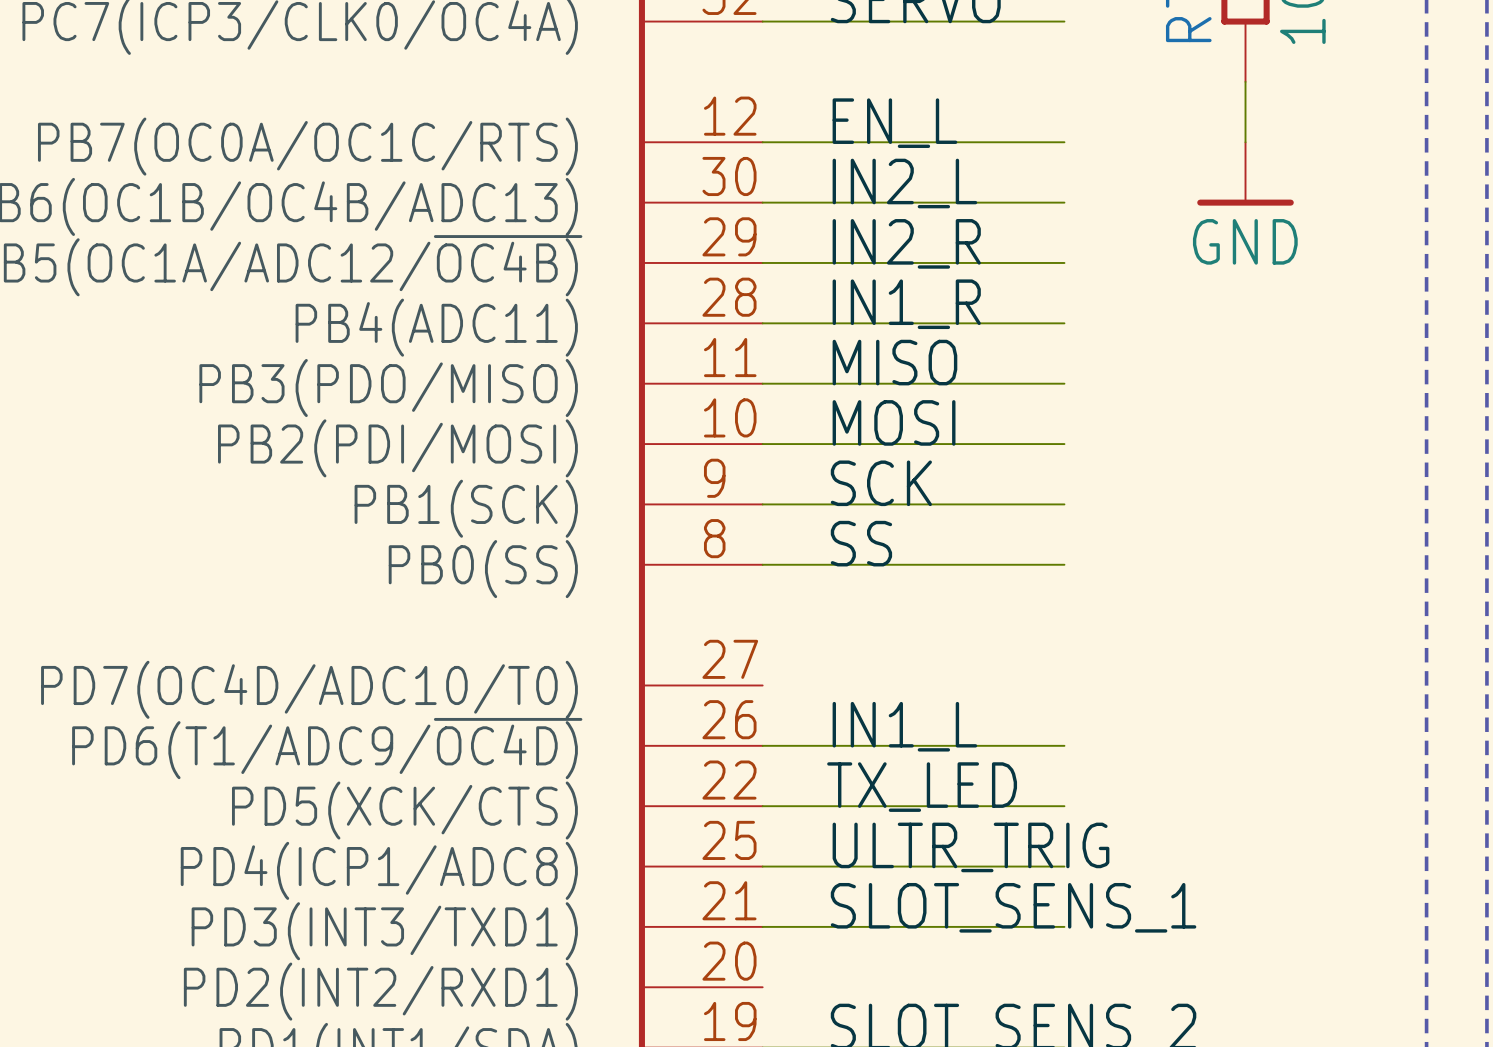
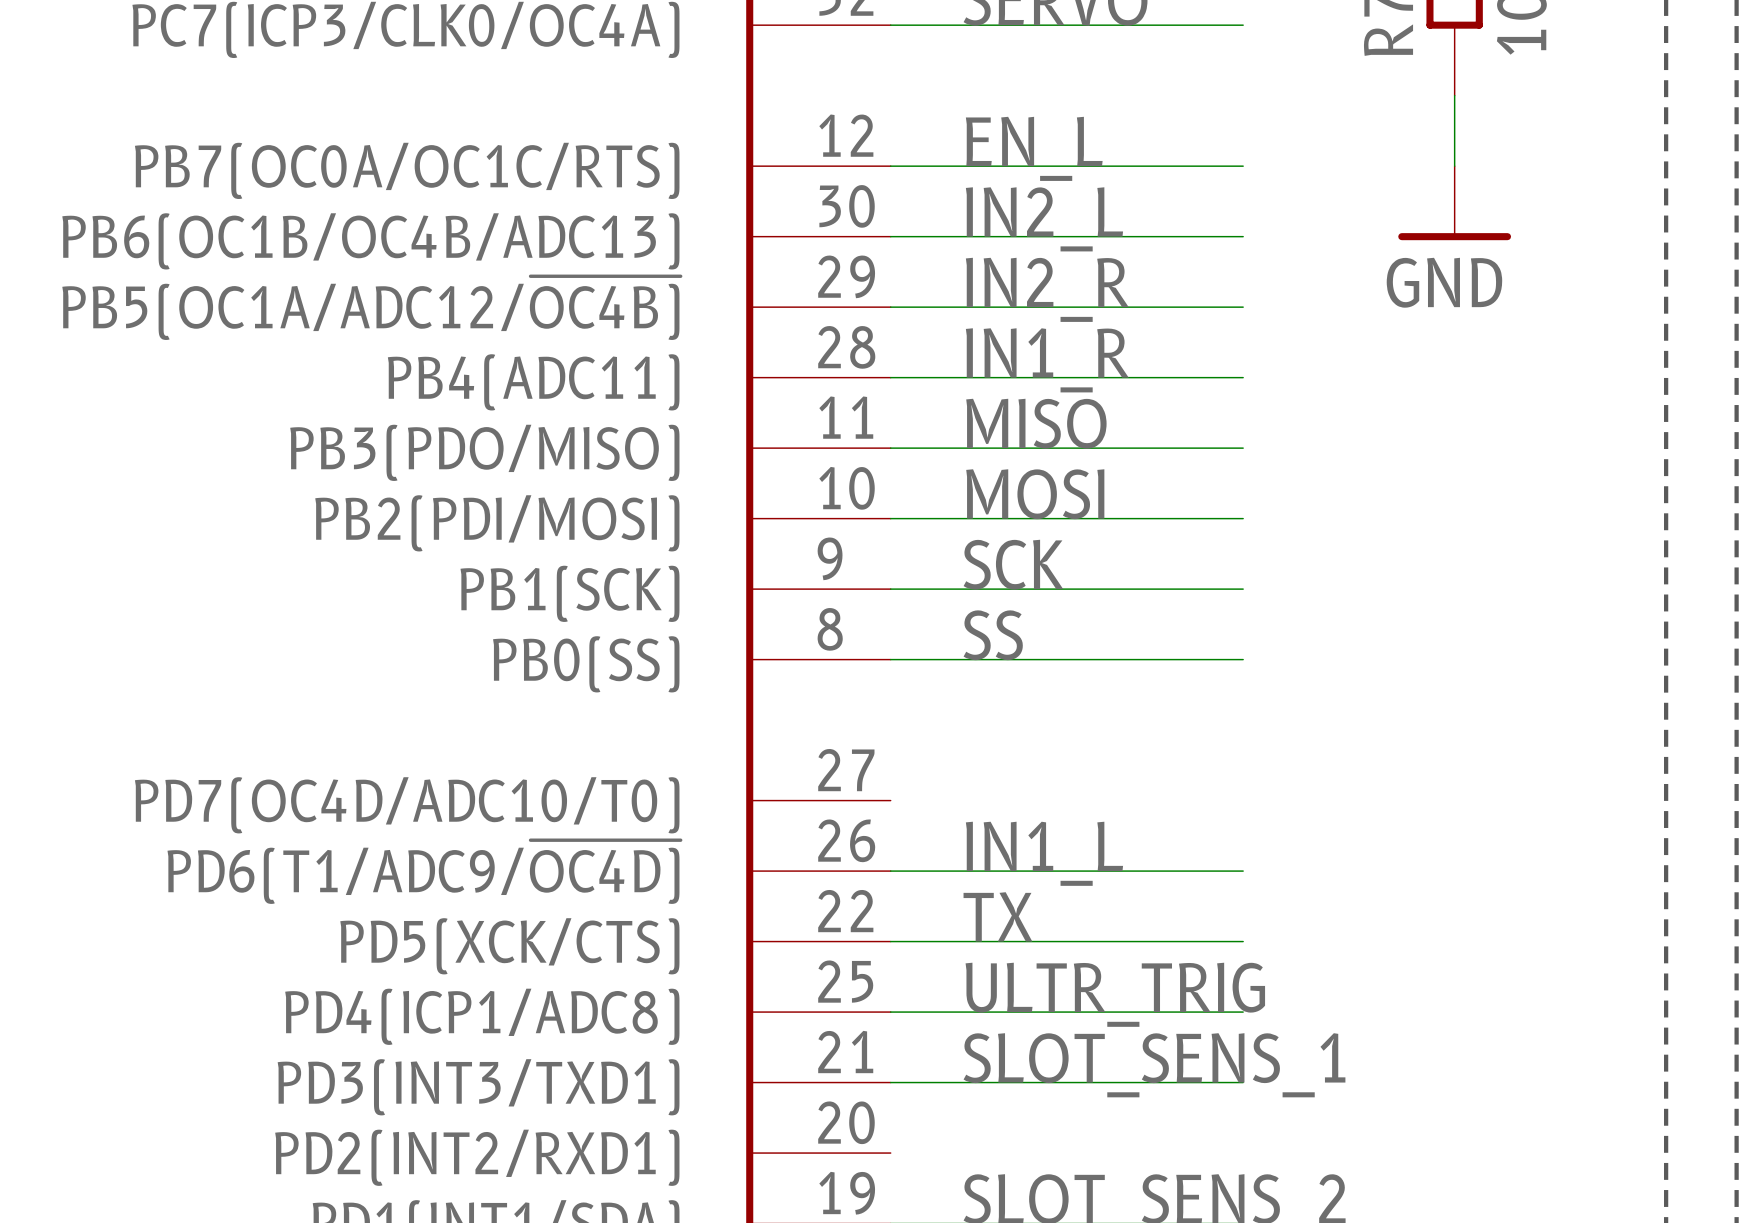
label: TX_LED (922, 787) -> TX (997, 916)

